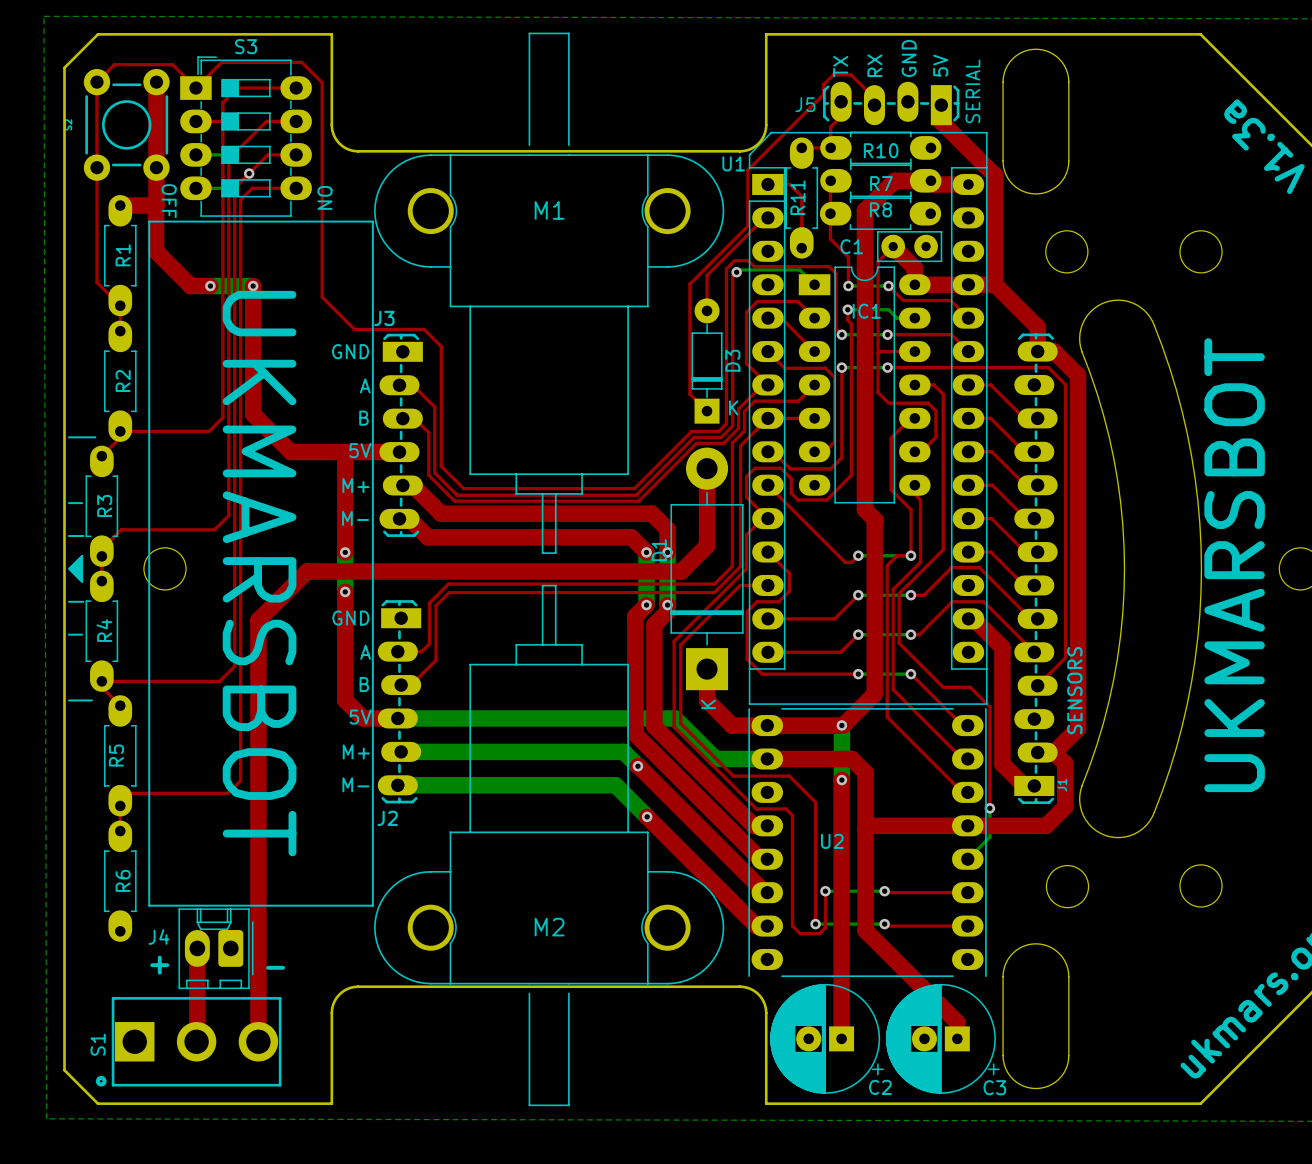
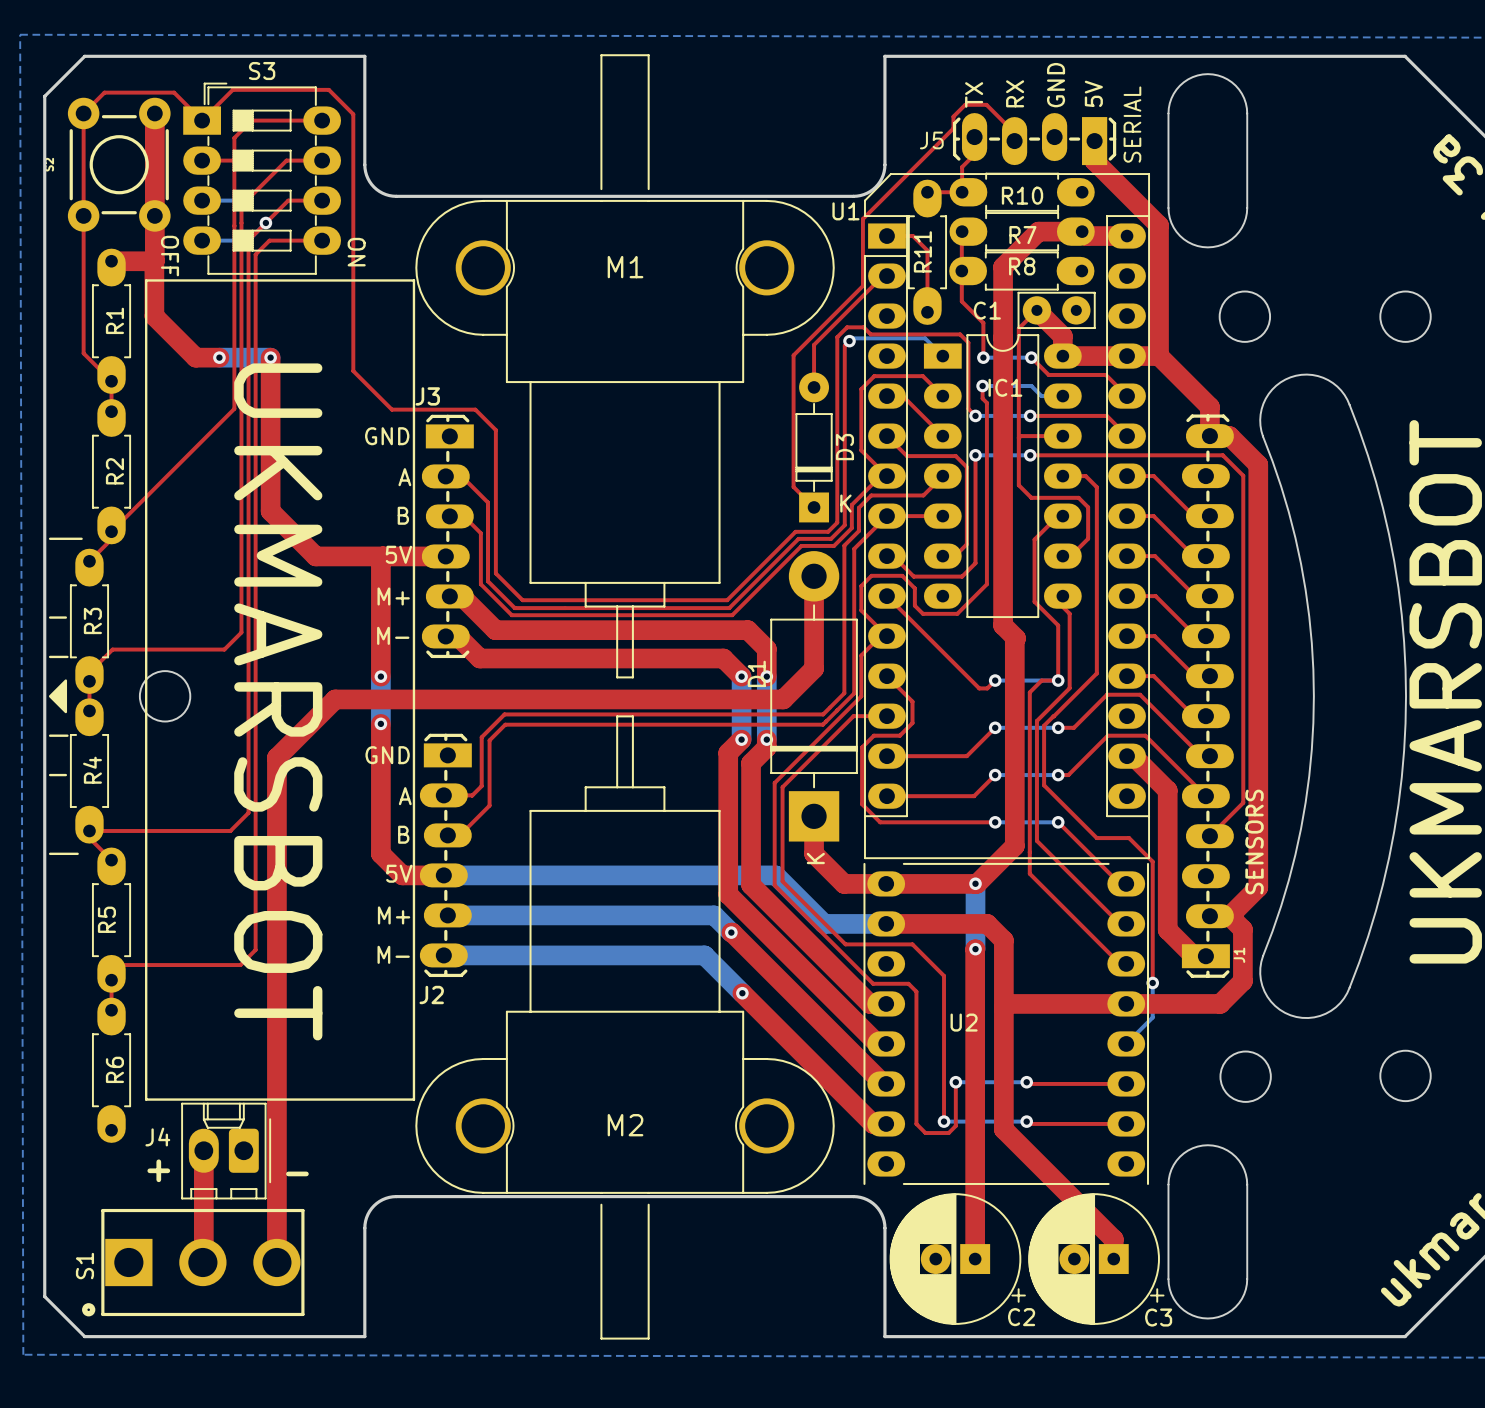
top track: (222, 328) (222, 417) (209, 431) (120, 431) -> (234, 408) (111, 531)

